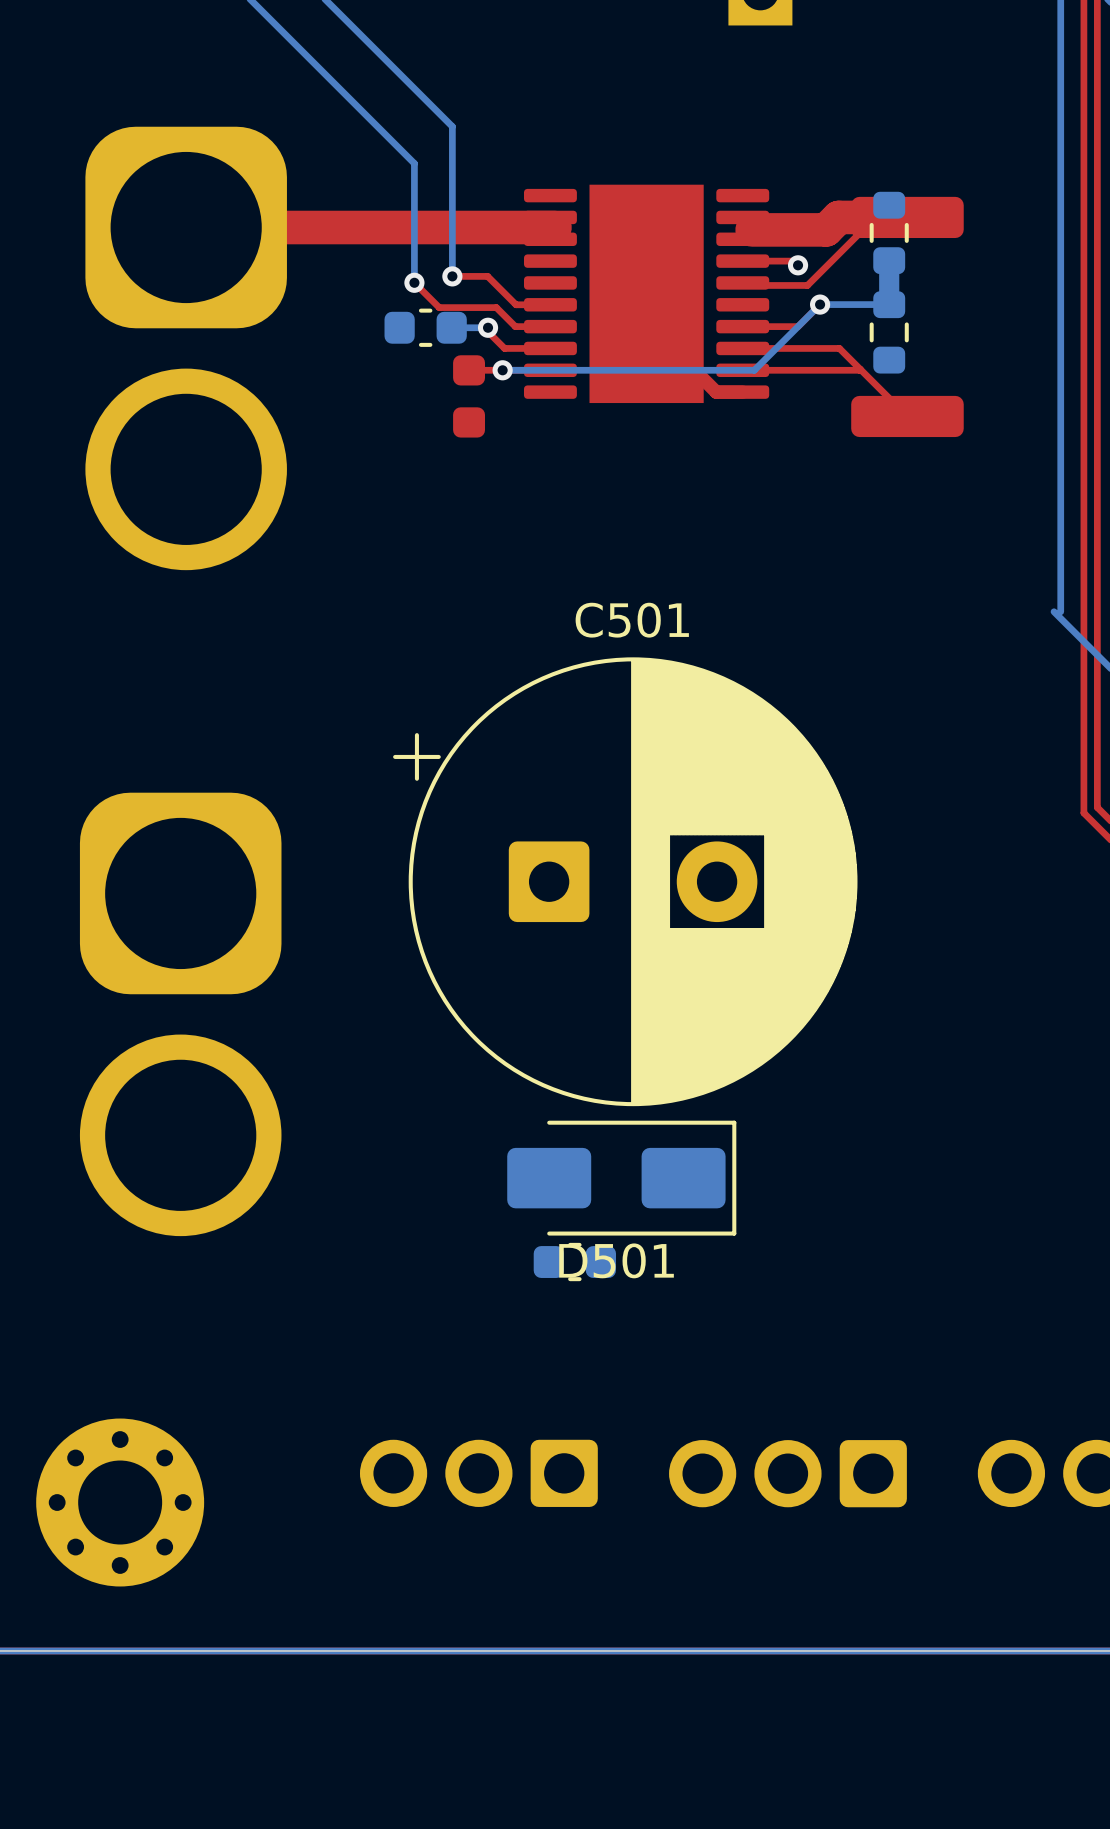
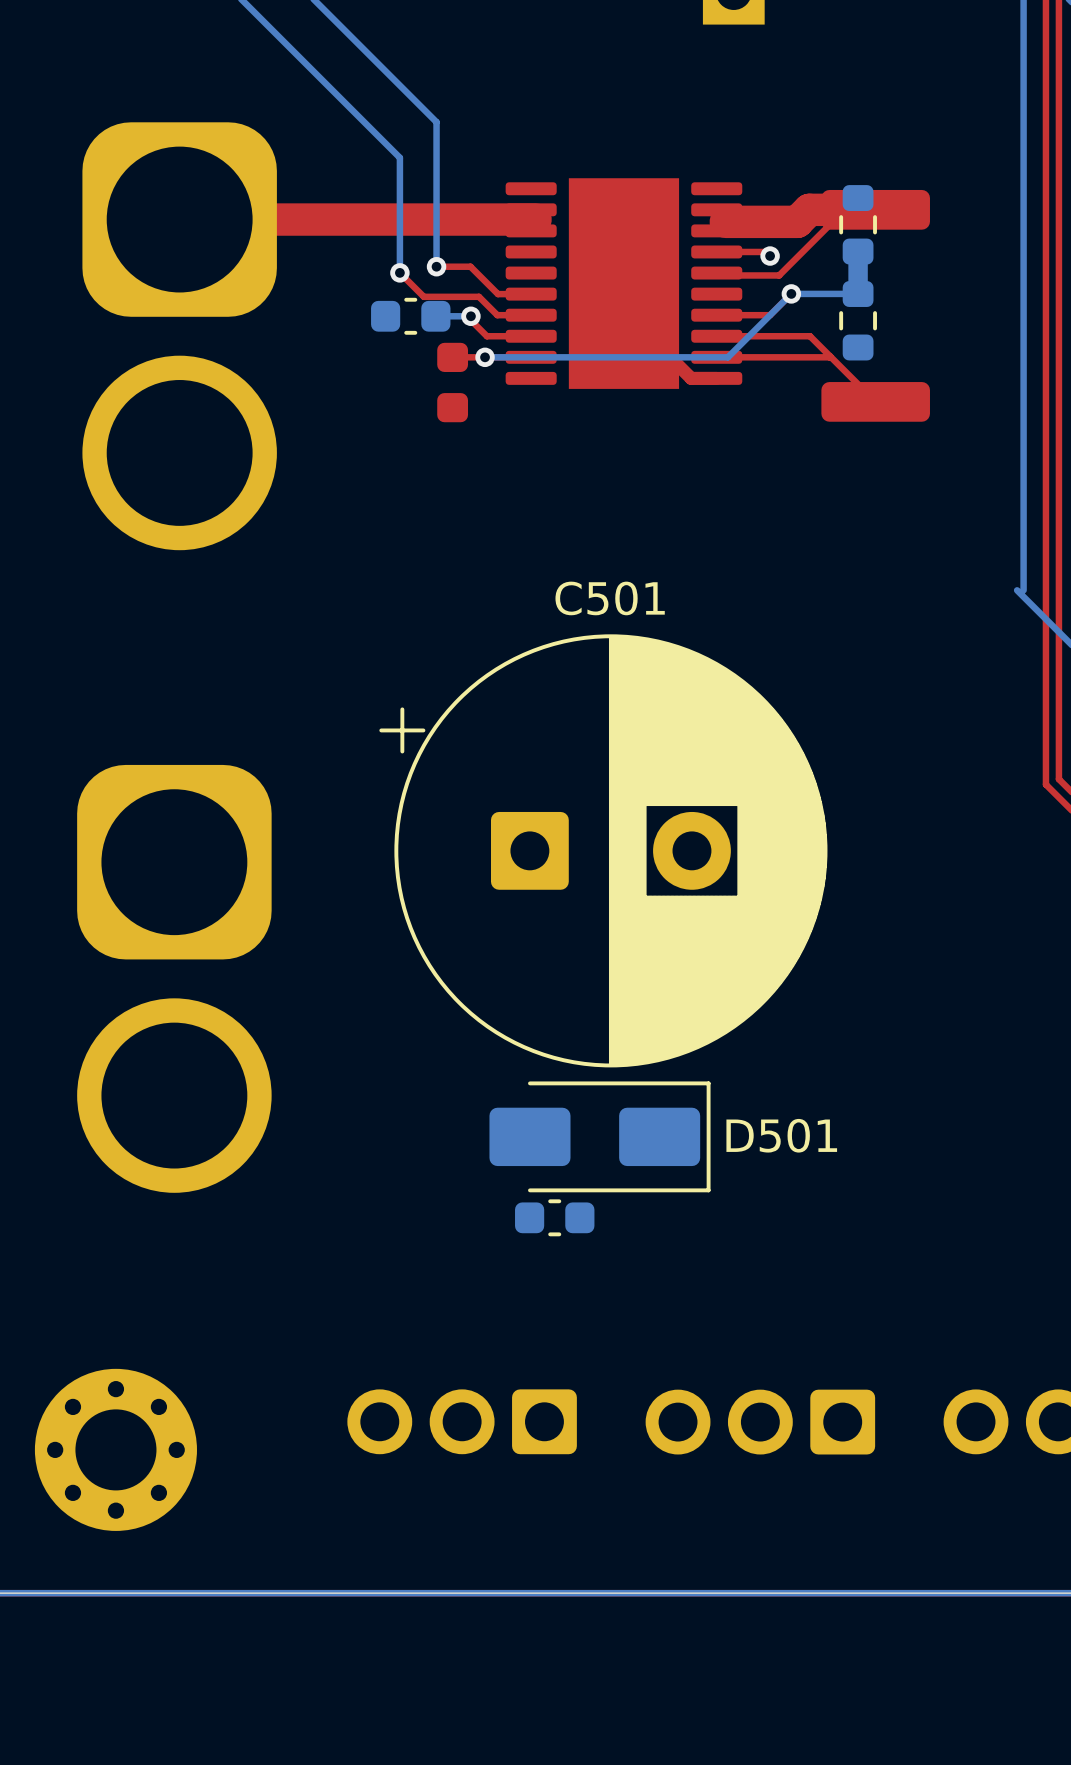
D501 name position: D501 (616, 1260) -> D501 (781, 1135)

